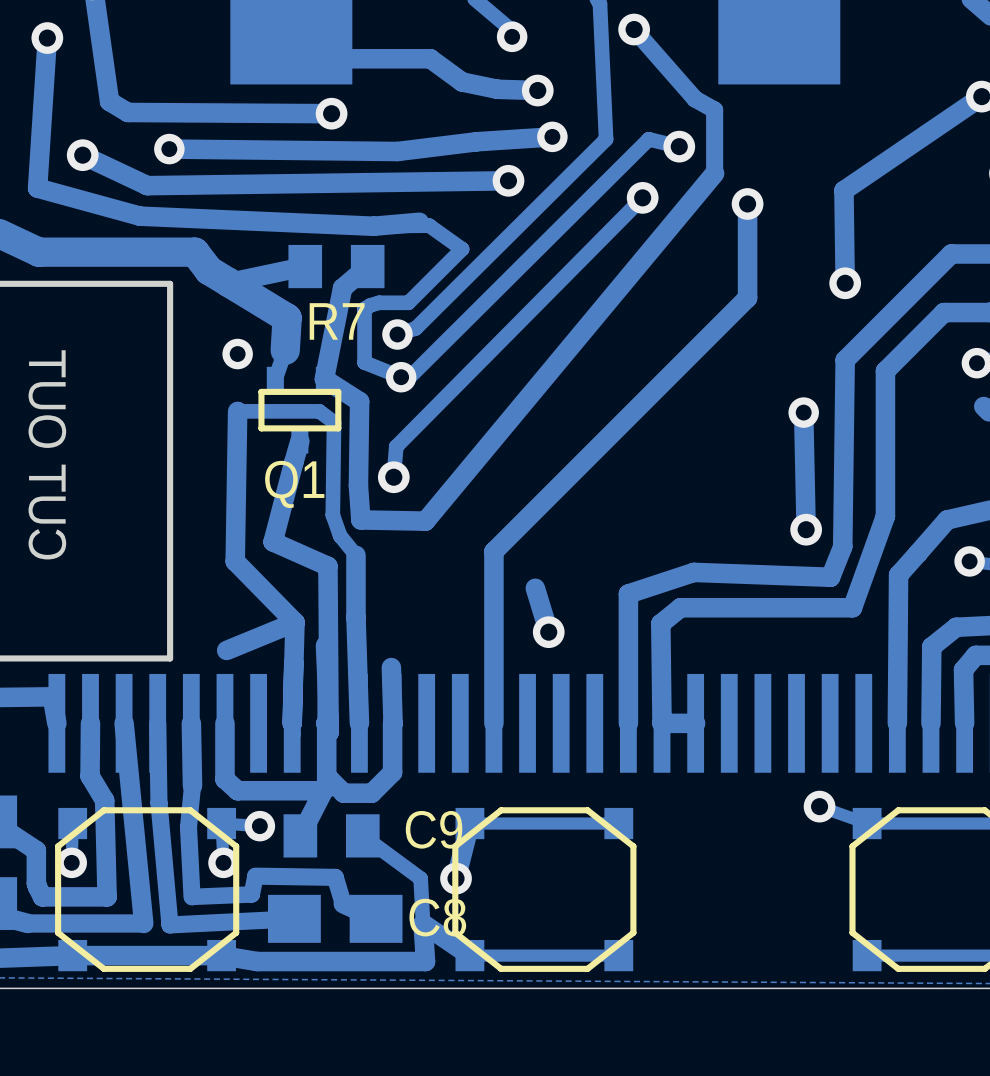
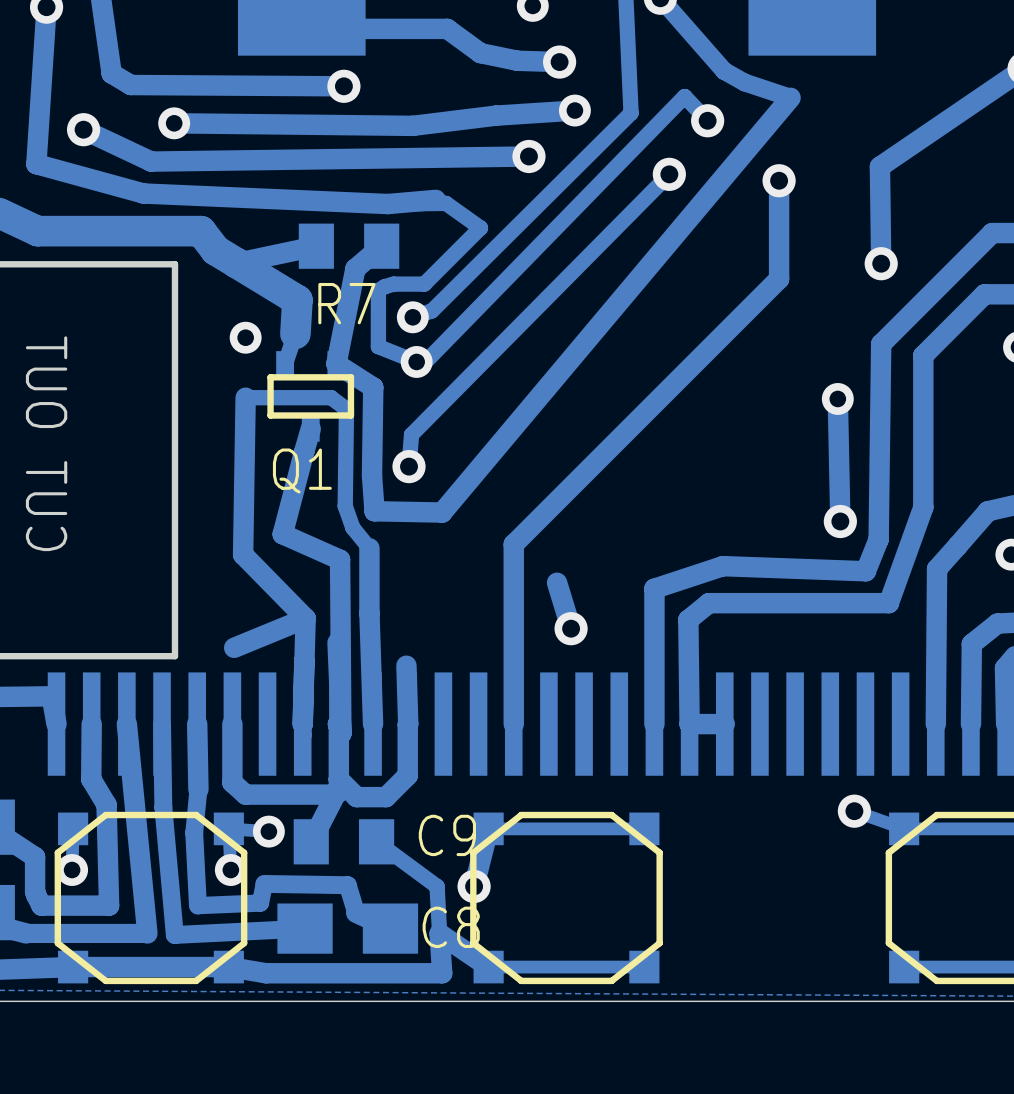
track: (714, 110) (714, 173) (425, 521) -> (744, 82) (790, 97) (442, 512)
track: (679, 146) (648, 139) (407, 379) -> (707, 120) (684, 96) (423, 364)

